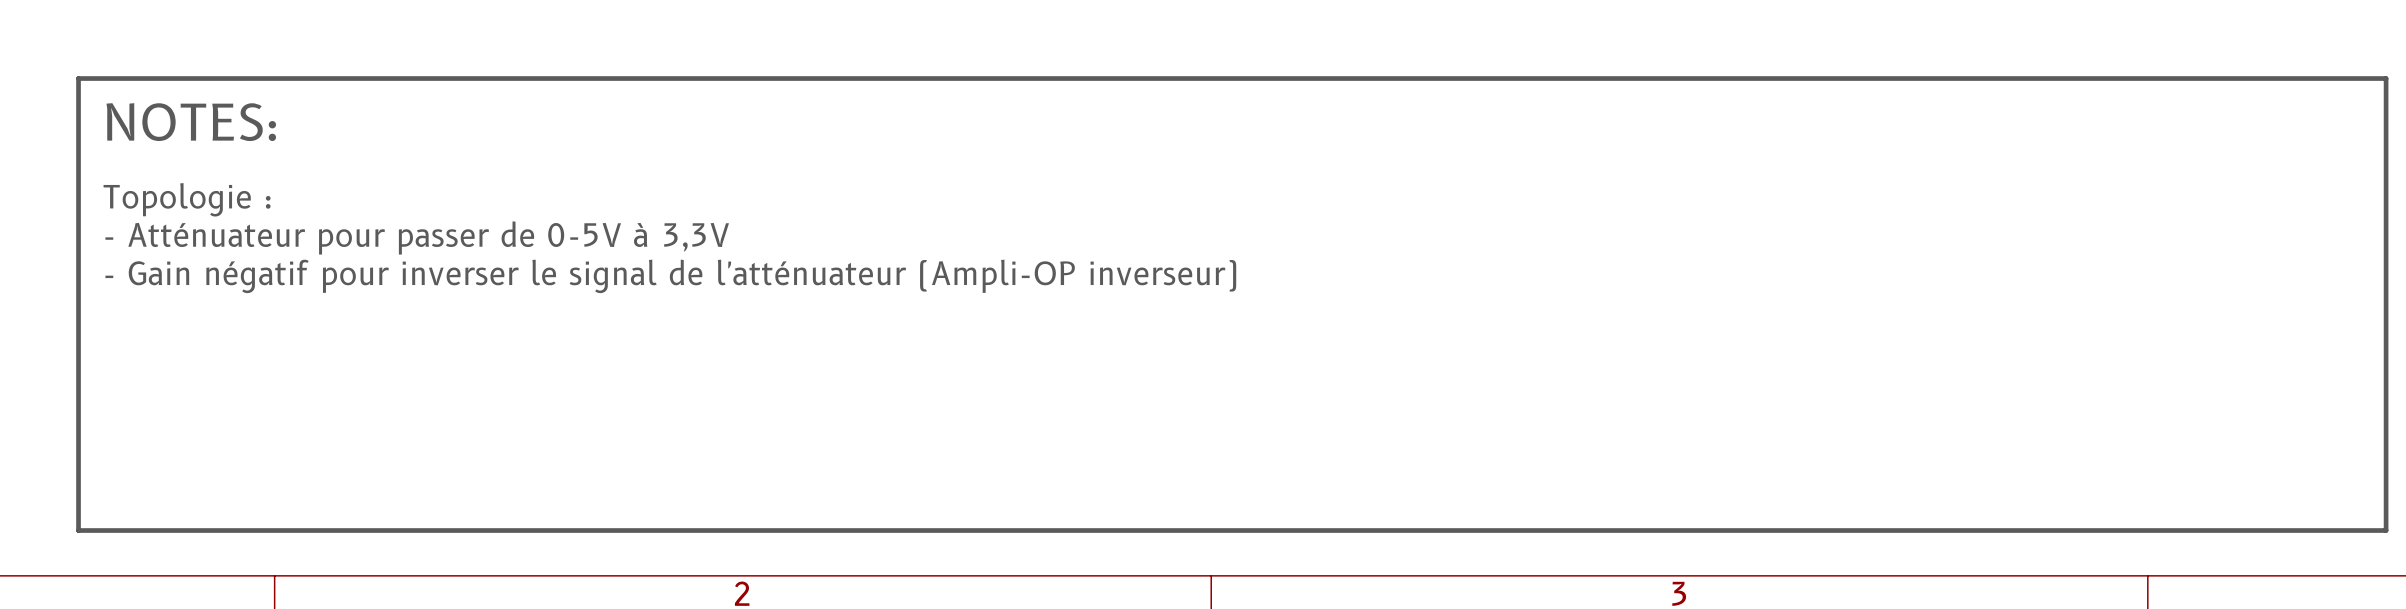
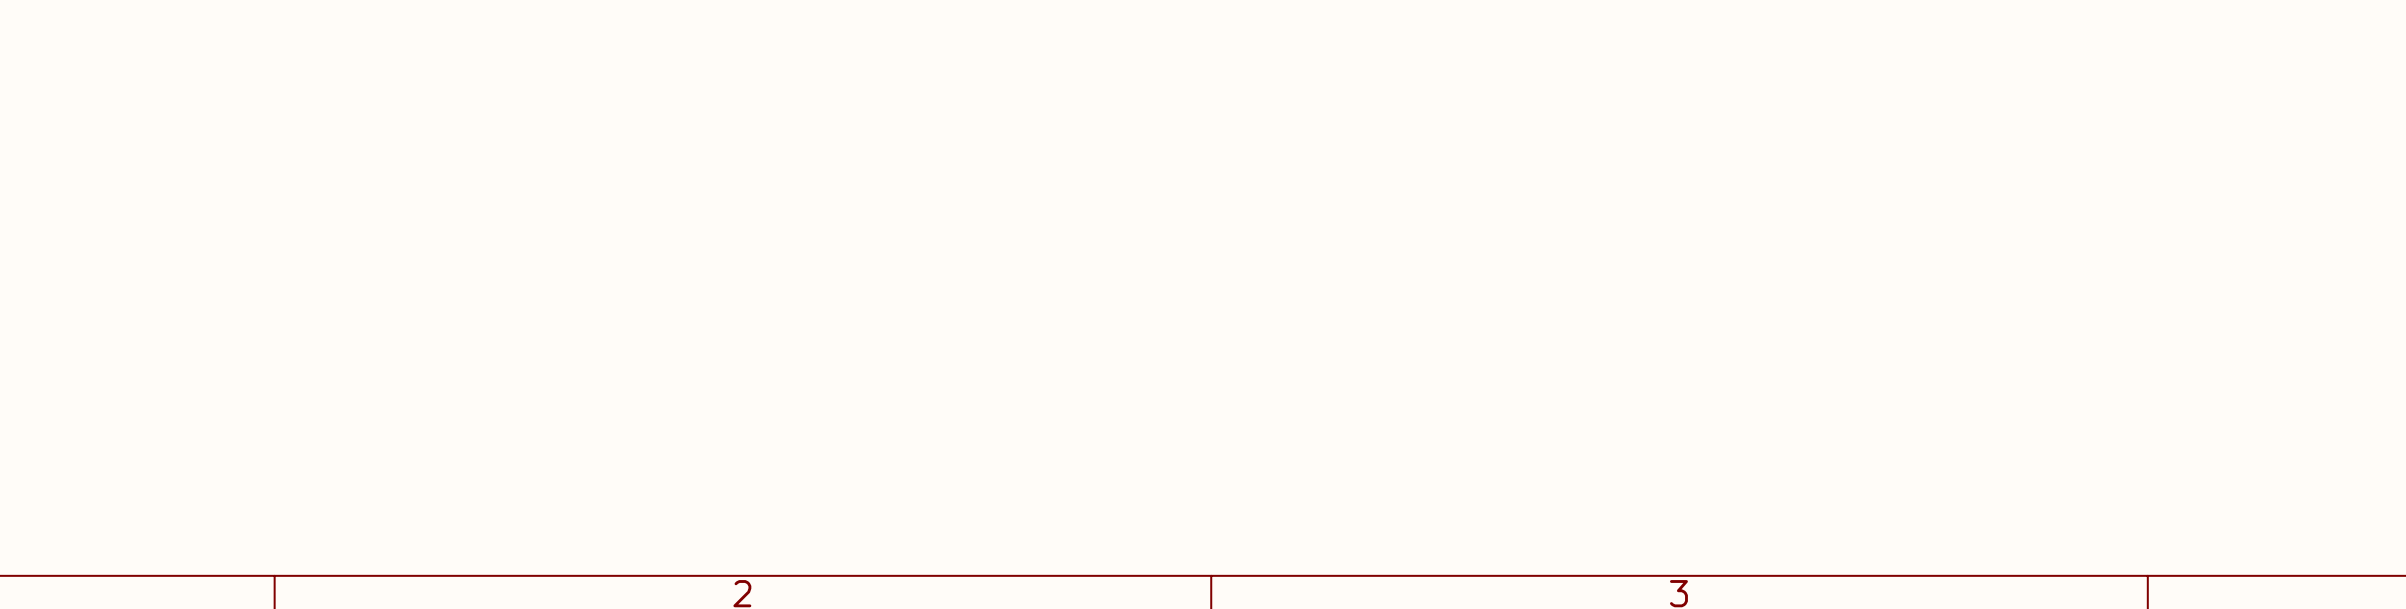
line: (78, 78) (78, 530) (2386, 530) (2386, 78) (78, 78) -> none
text: NOTES: (191, 122) -> none
text: Topologie : (187, 199) -> none
text: - Atténuateur pour passer de 0-5V à 3,3V (417, 237) -> none
text: - Gain négatif pour inverser le signal de l'atténuateur (Ampli-OP inverseur) (670, 276) -> none

